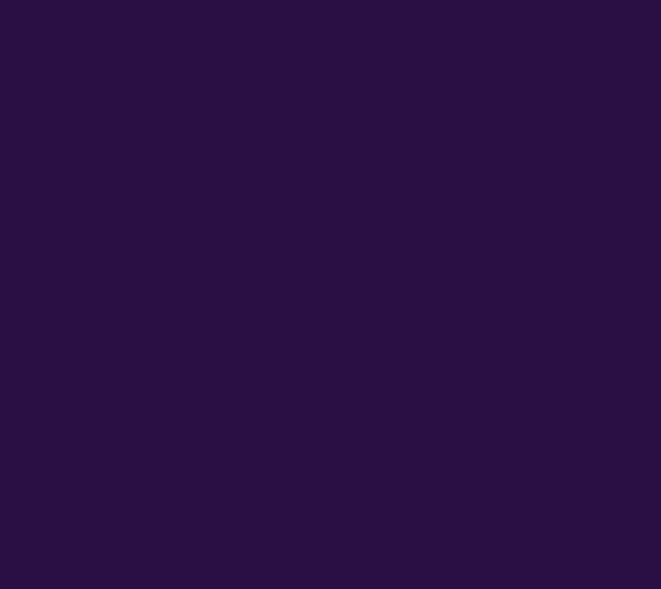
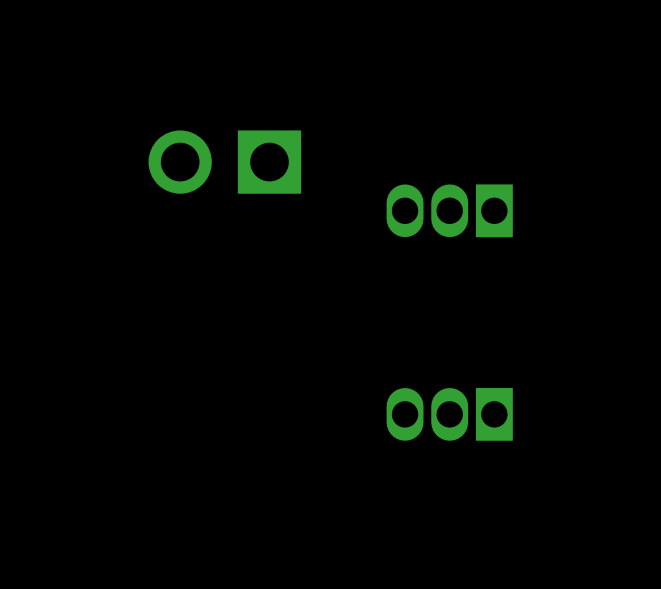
part: none -> (224, 162)
part: none -> (449, 210)
part: none -> (449, 414)

